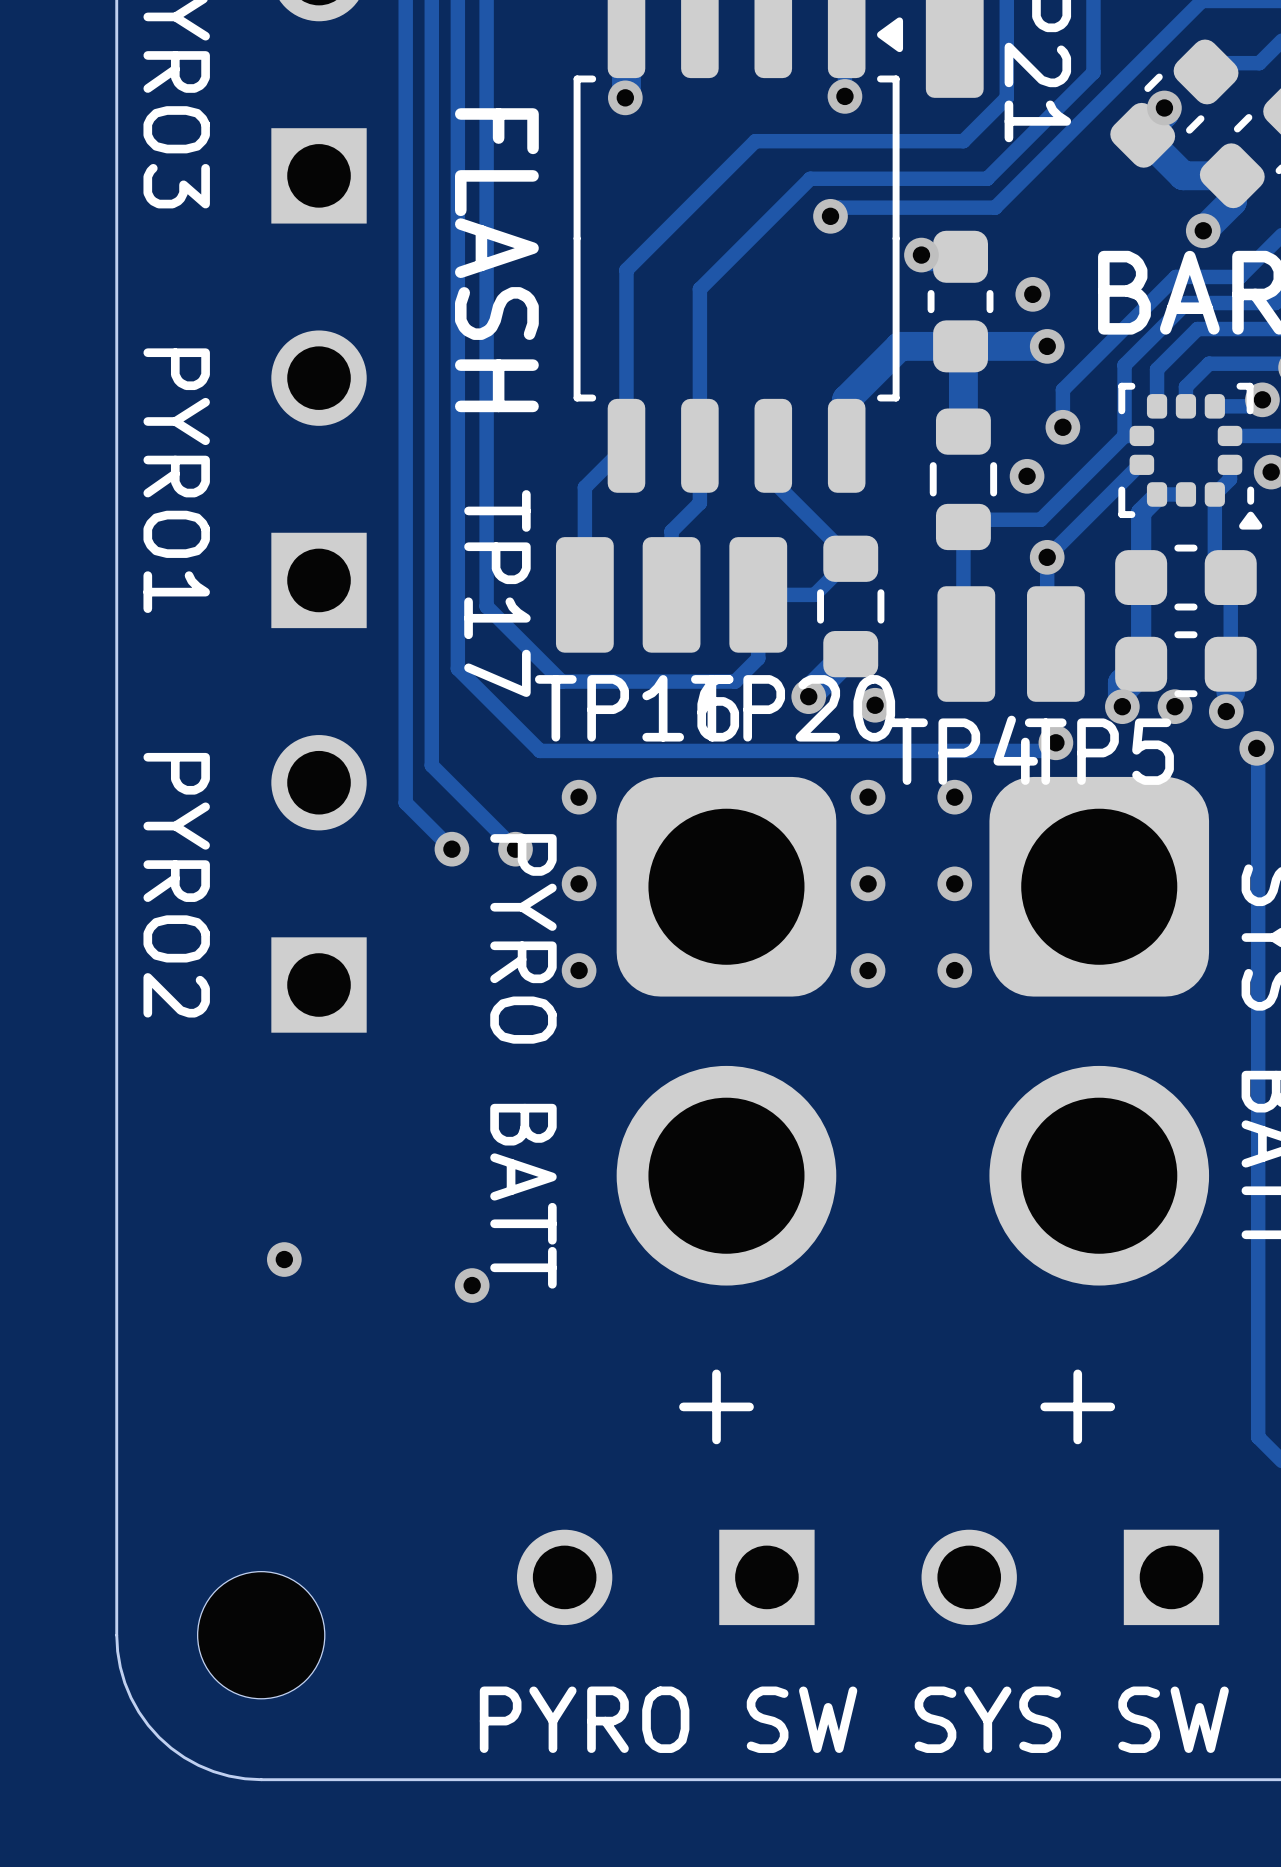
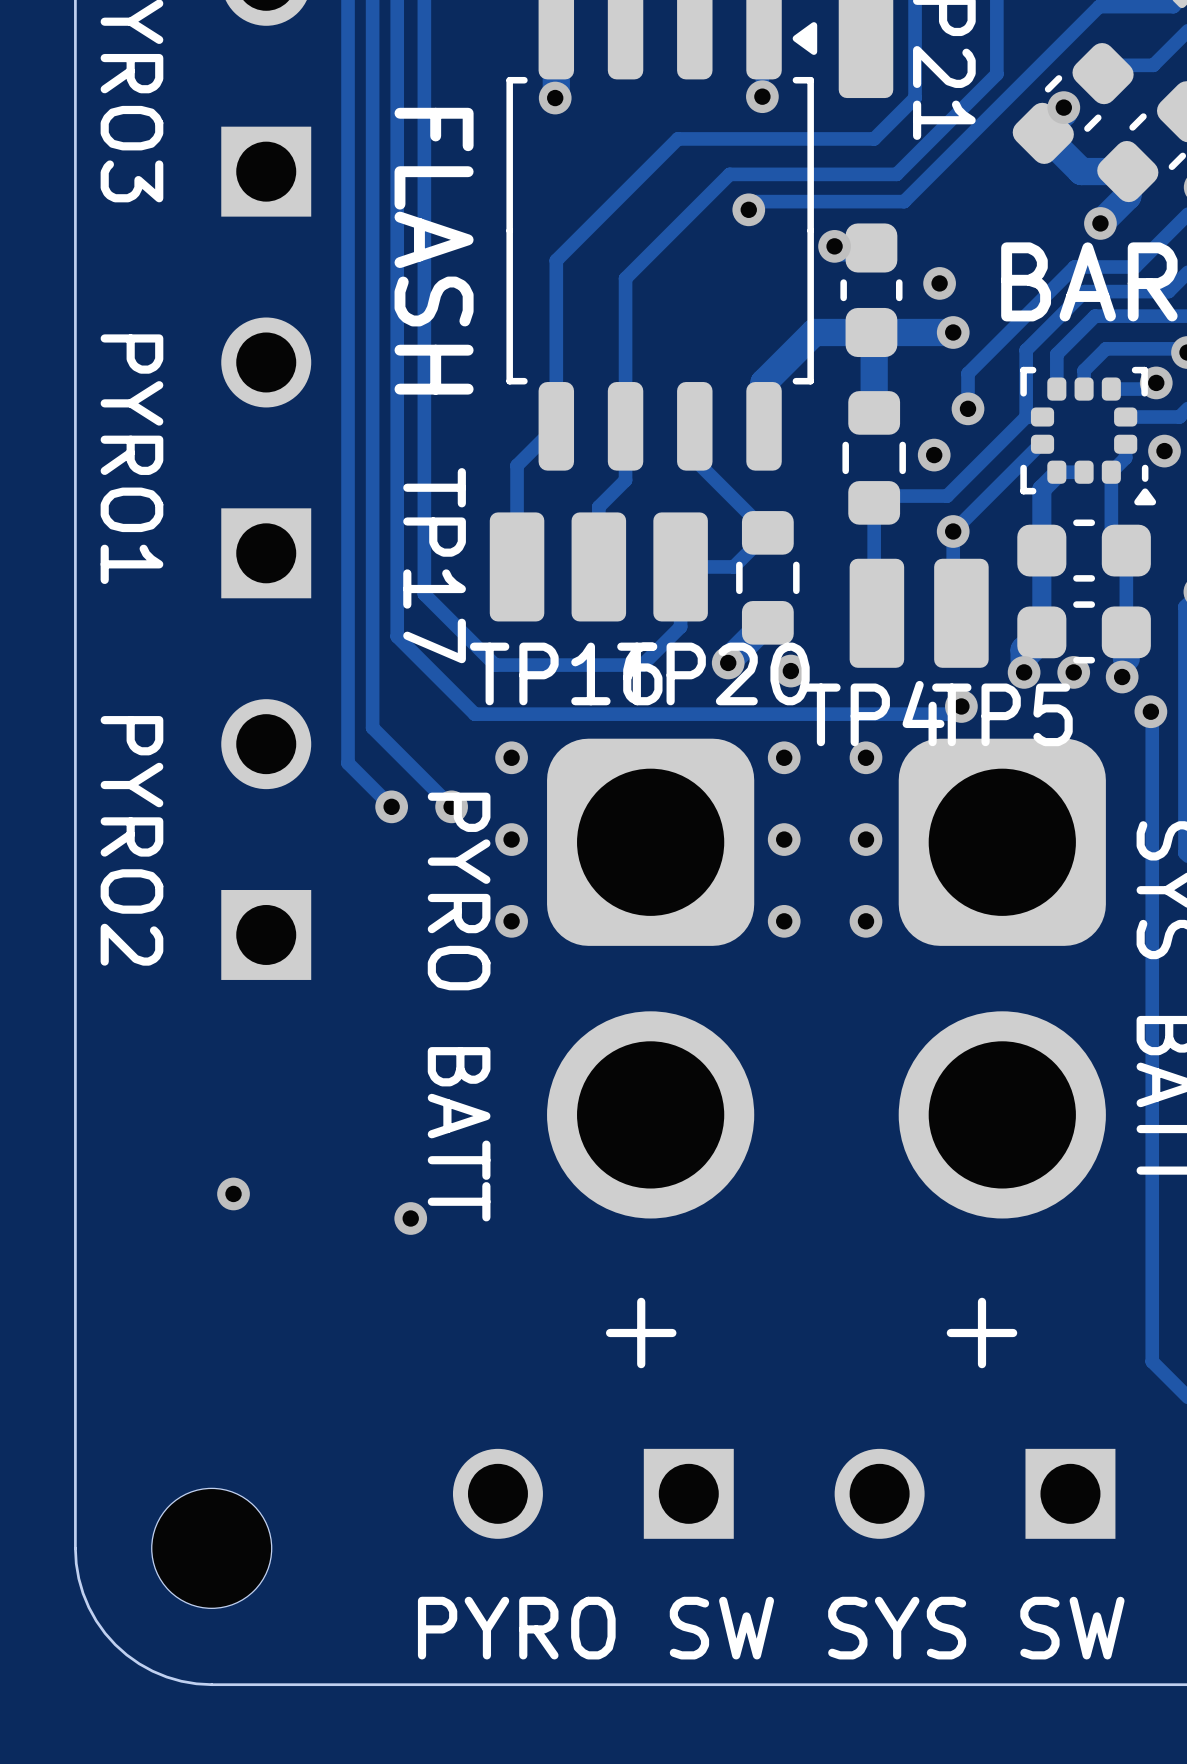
track: (486, 606) (561, 681) (735, 681) -> (424, 577) (424, 594) (495, 665) (642, 665) (658, 648)

